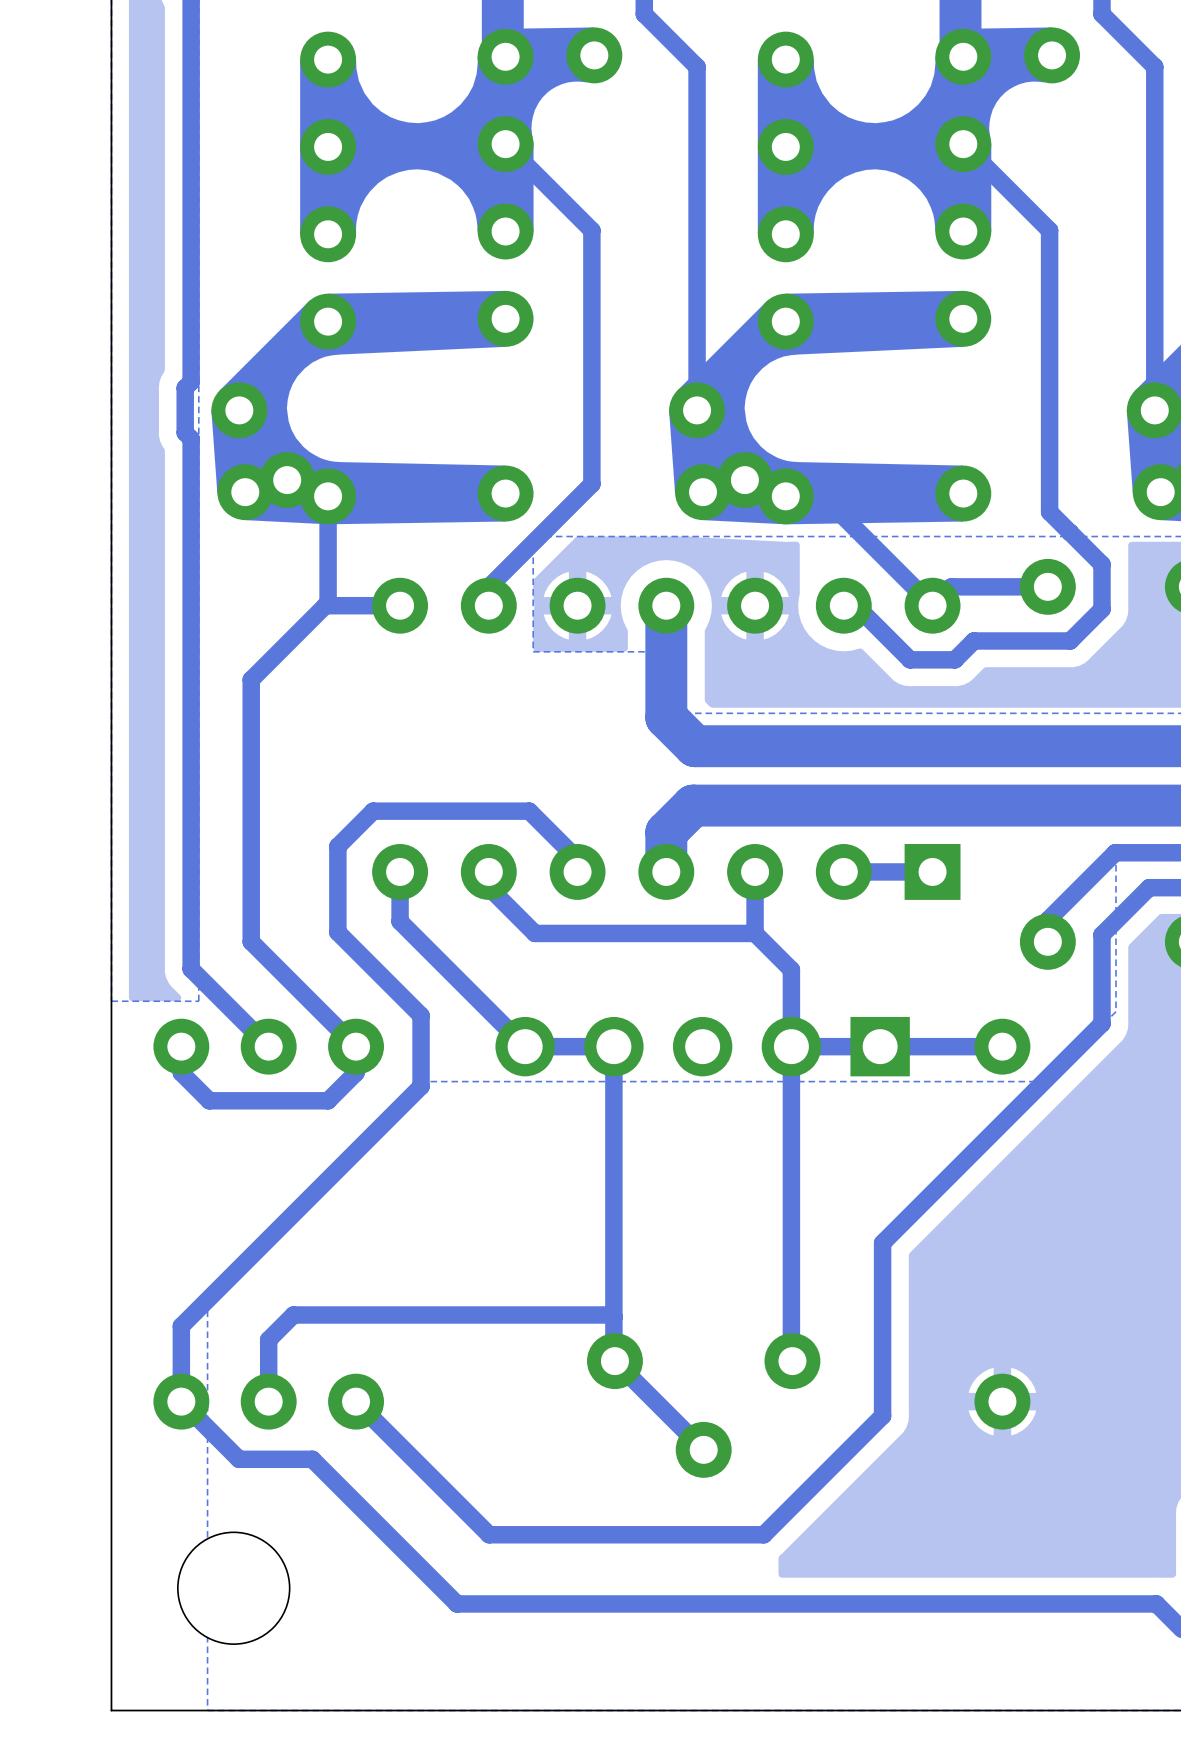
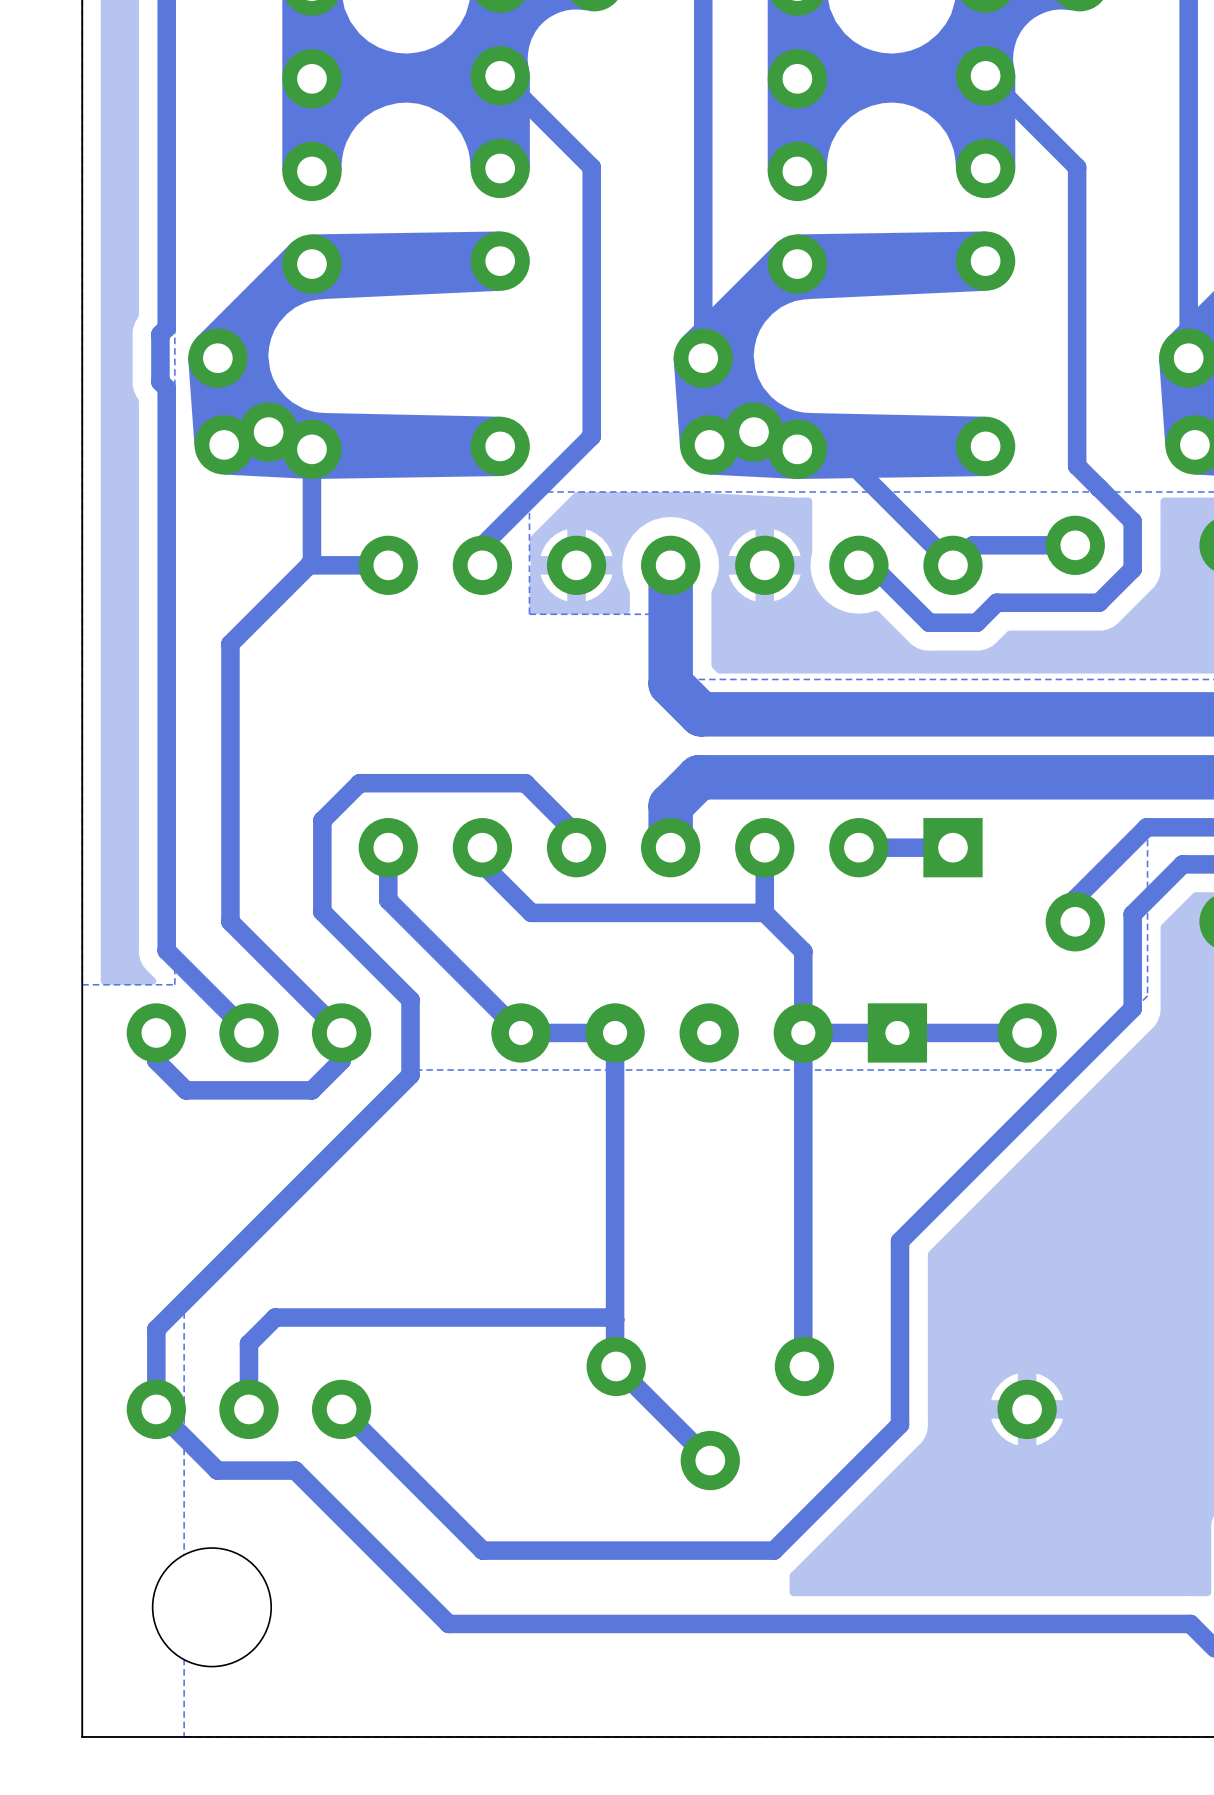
part footprint: [495, 1016, 910, 1077] -> [491, 1003, 928, 1063]

